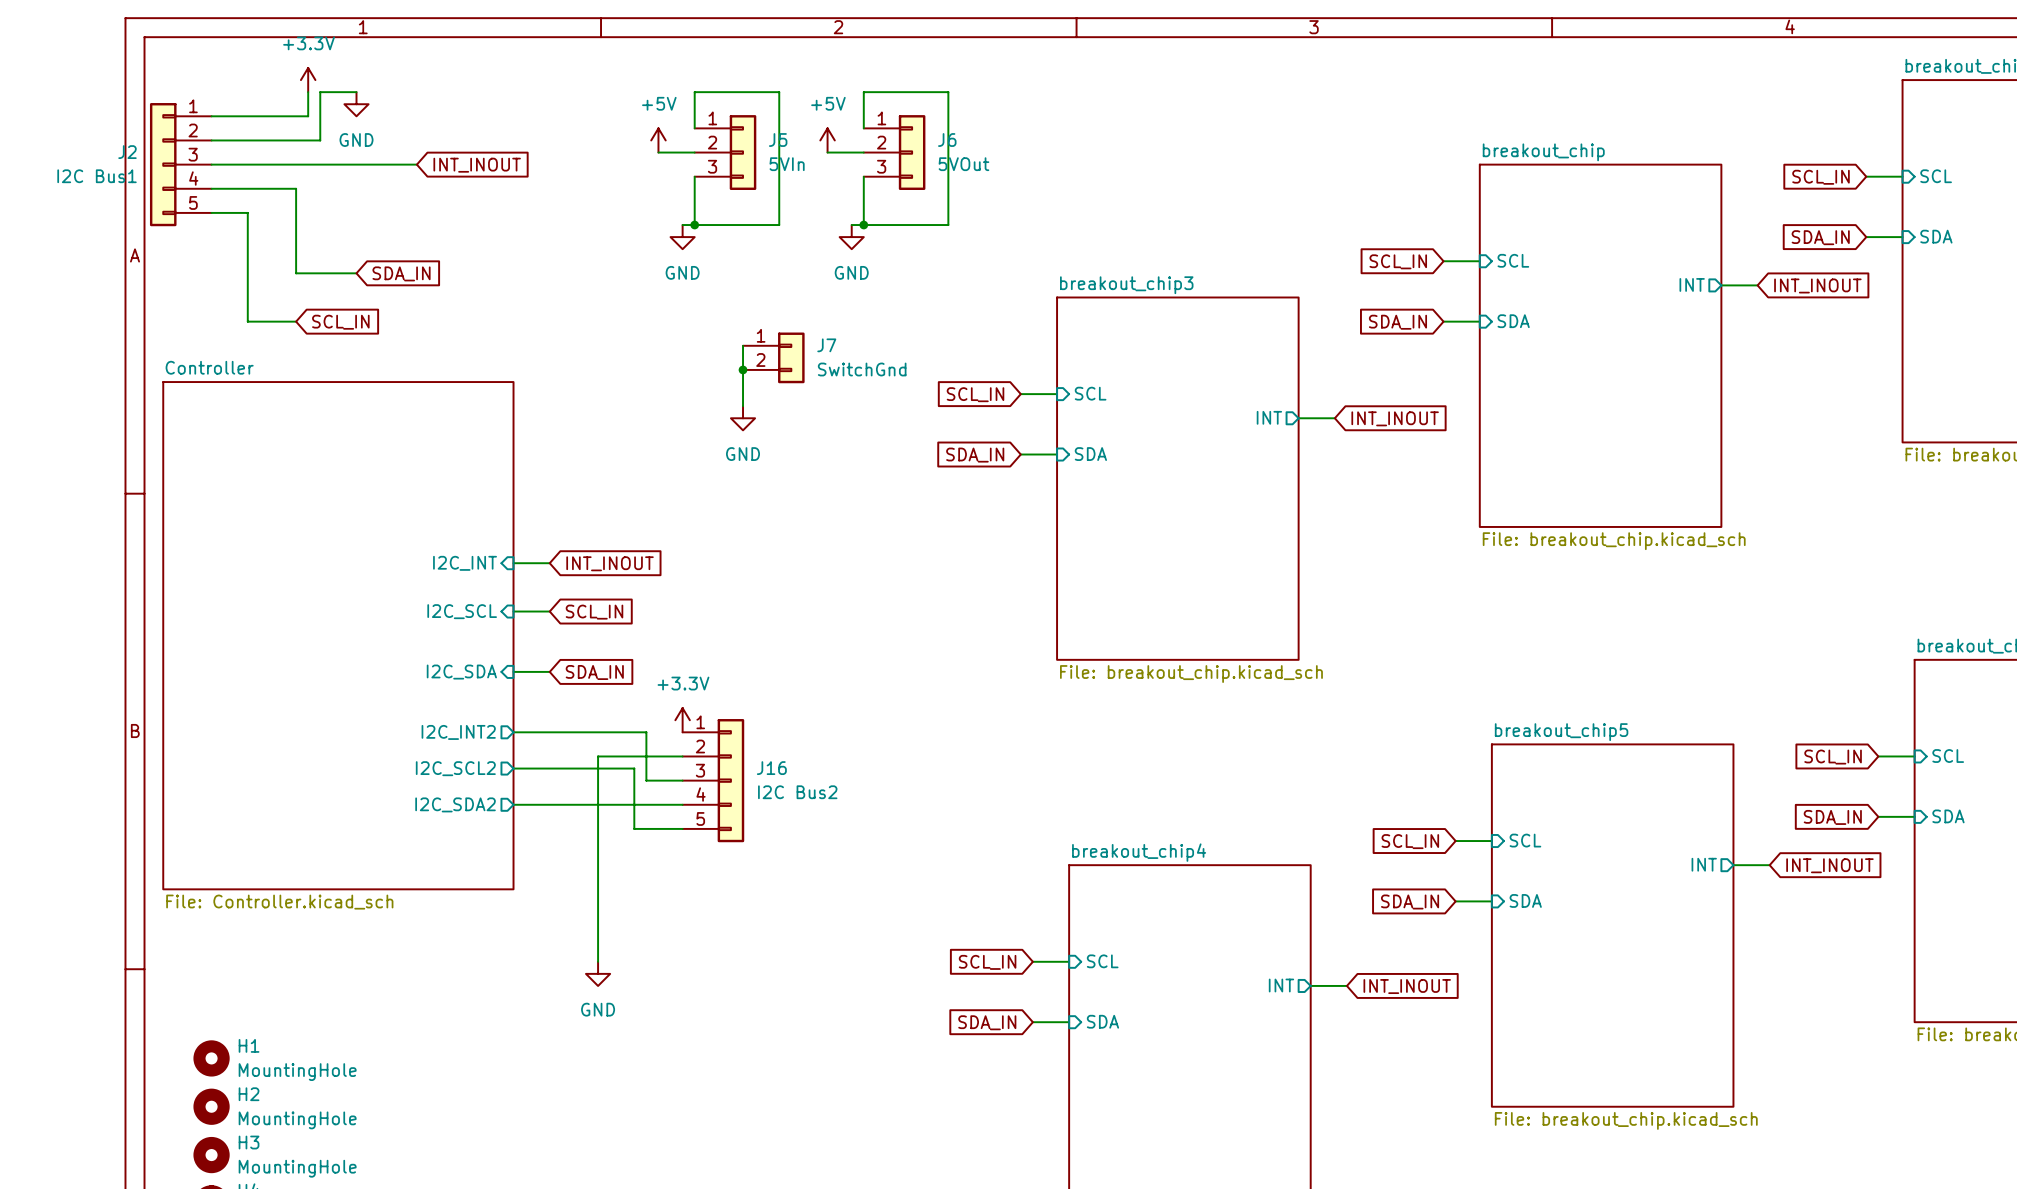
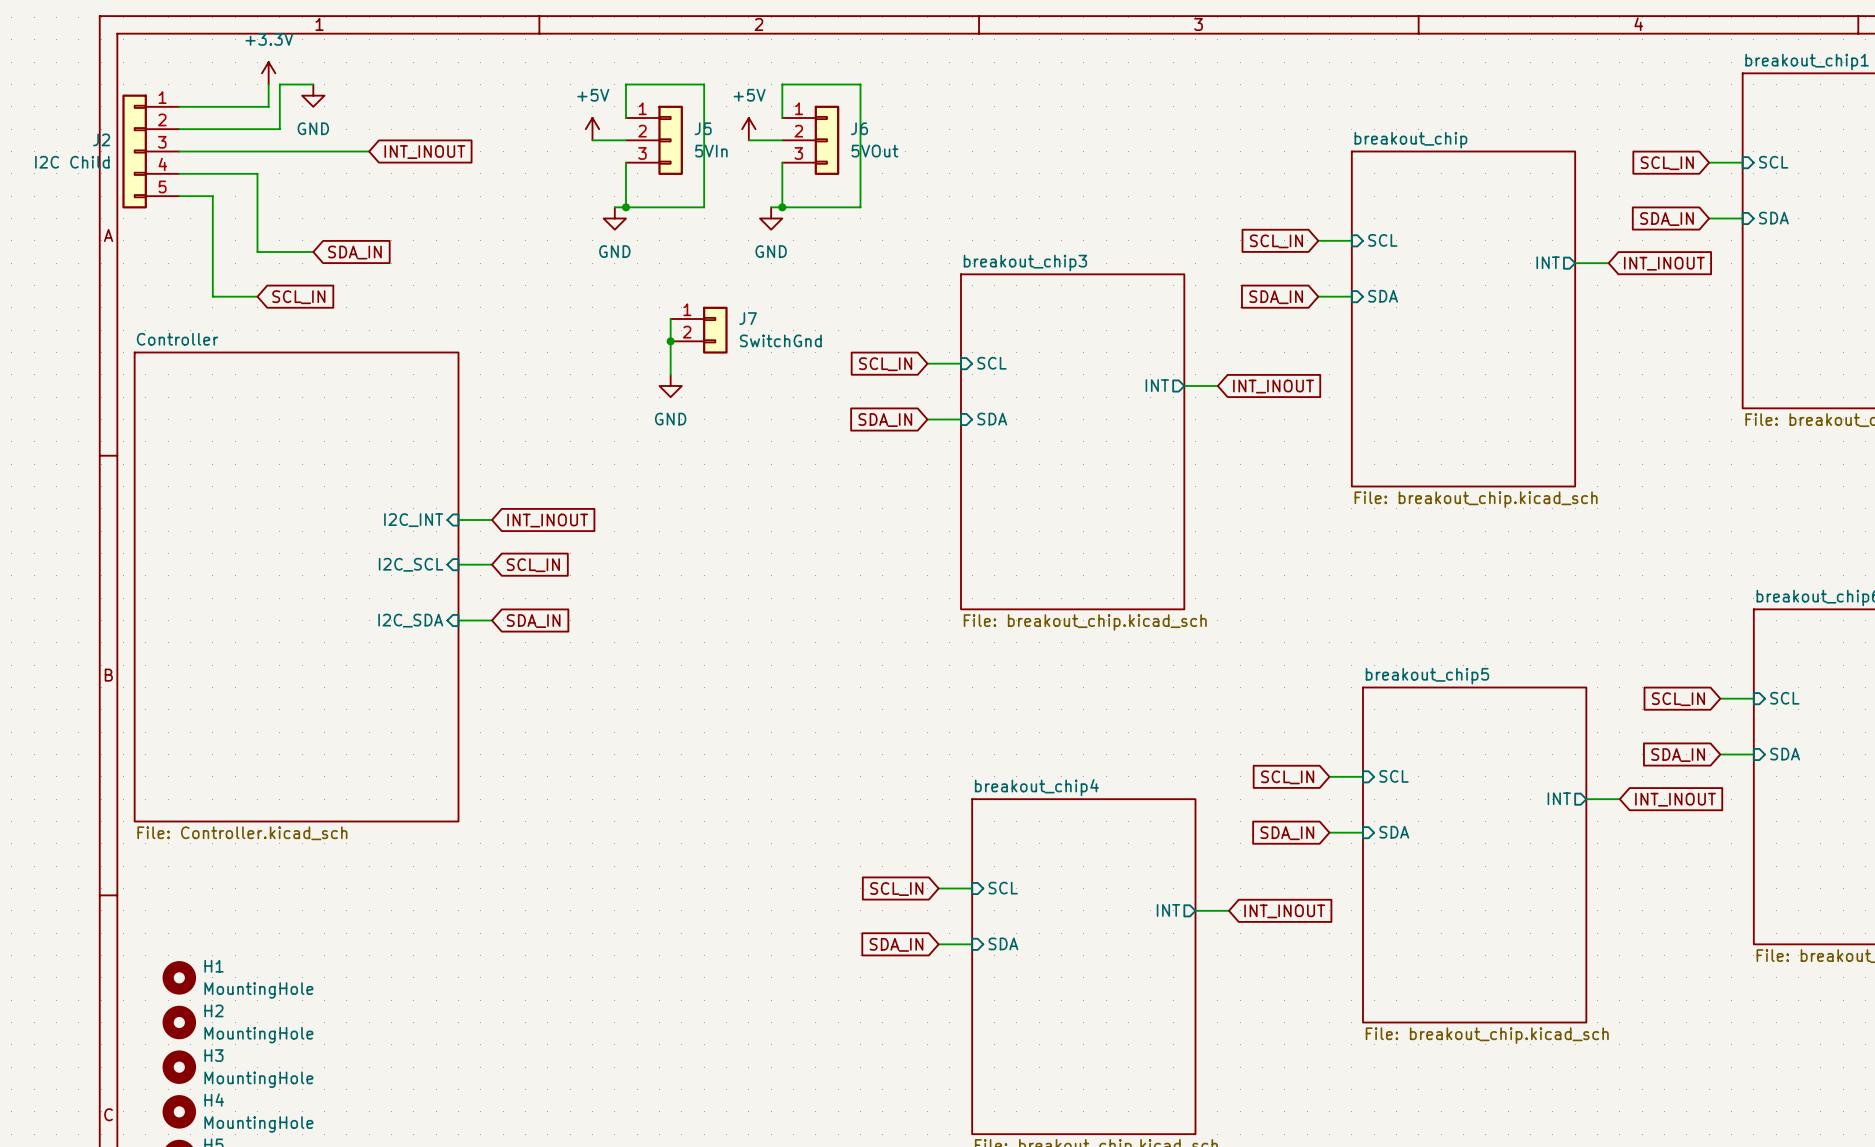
J2 value: I2C Bus1 (97, 176) -> I2C Child (72, 162)
power symbol: +3.3V (682, 720) -> none
sheet pin: I2C_INT2 (458, 732) -> none
wire: (513, 732) (646, 732) (646, 780) (682, 780) -> none
wire: (682, 756) (598, 756) (598, 961) -> none
sheet pin: I2C_SCL2 (455, 768) -> none
wire: (513, 768) (634, 768) (634, 828) (682, 828) -> none
J16: I2C Bus2 (713, 780) -> none
sheet pin: I2C_SDA2 (455, 804) -> none
wire: (513, 804) (682, 804) -> none
power symbol: GND (598, 973) -> none

